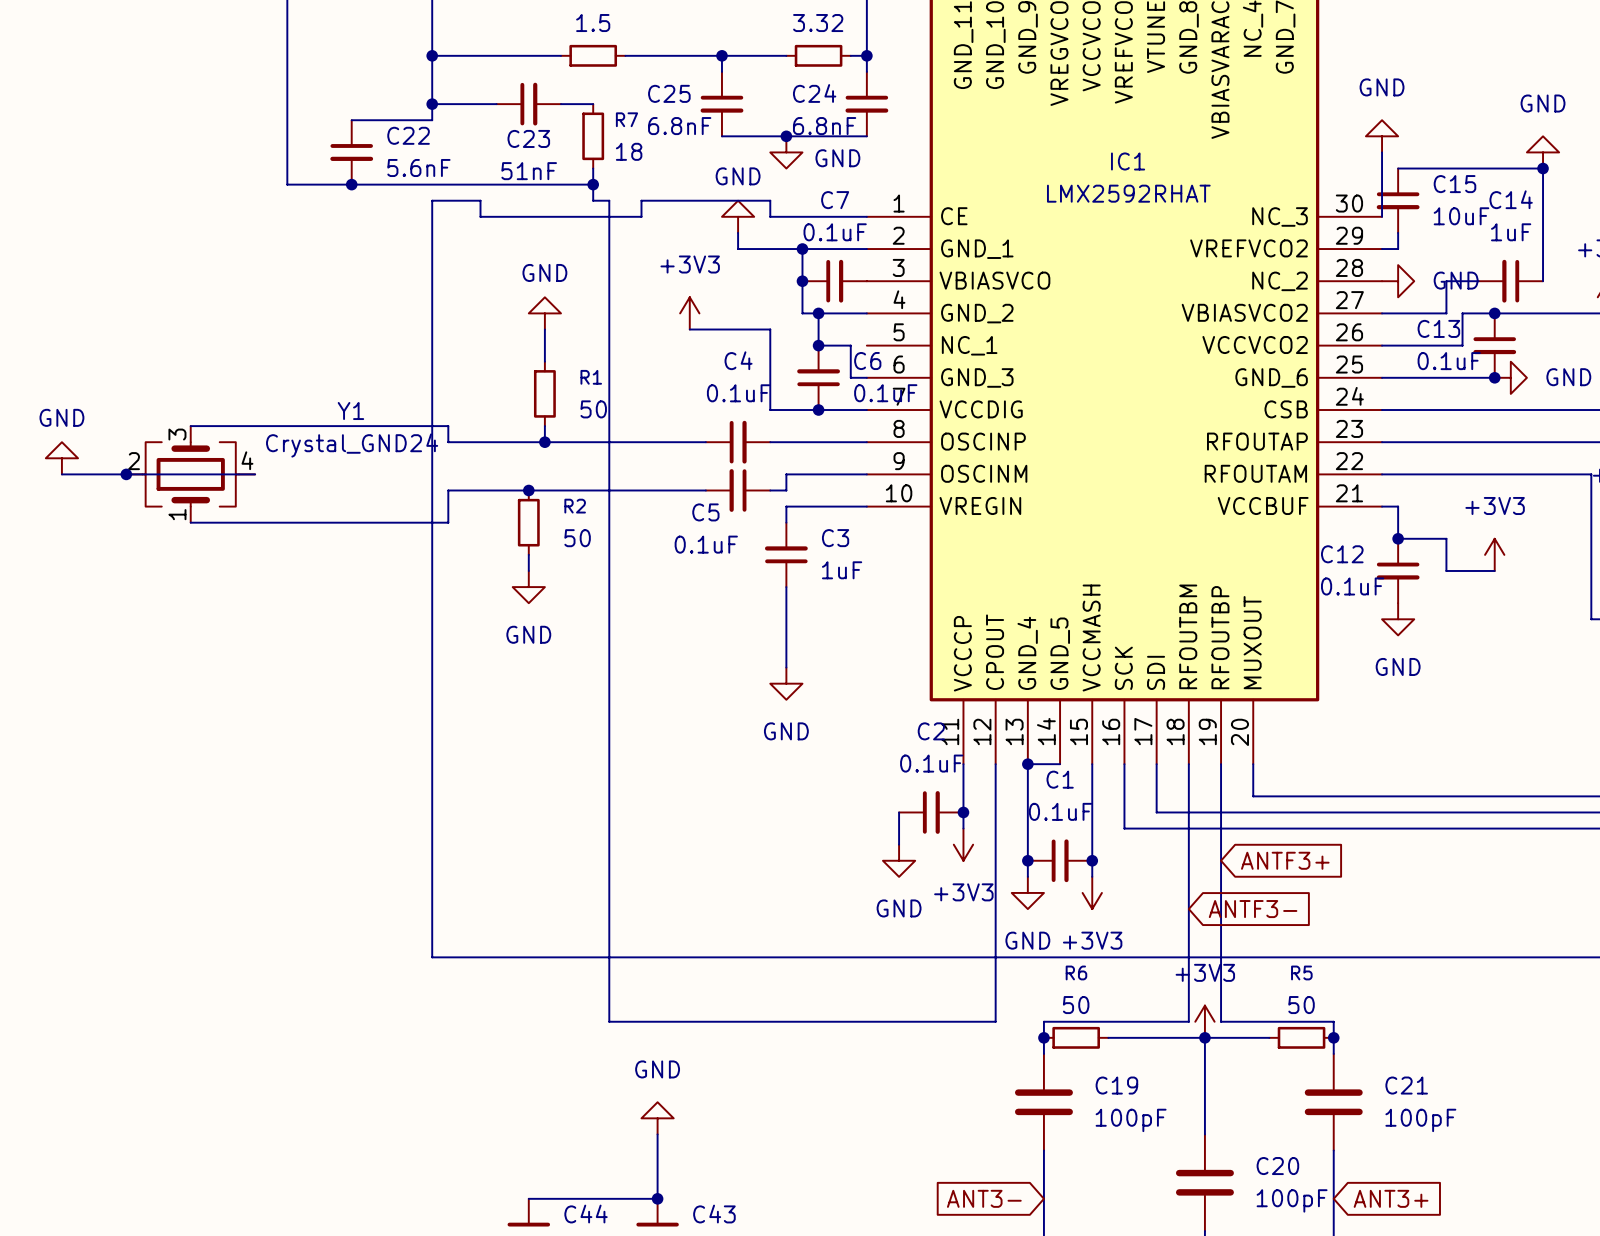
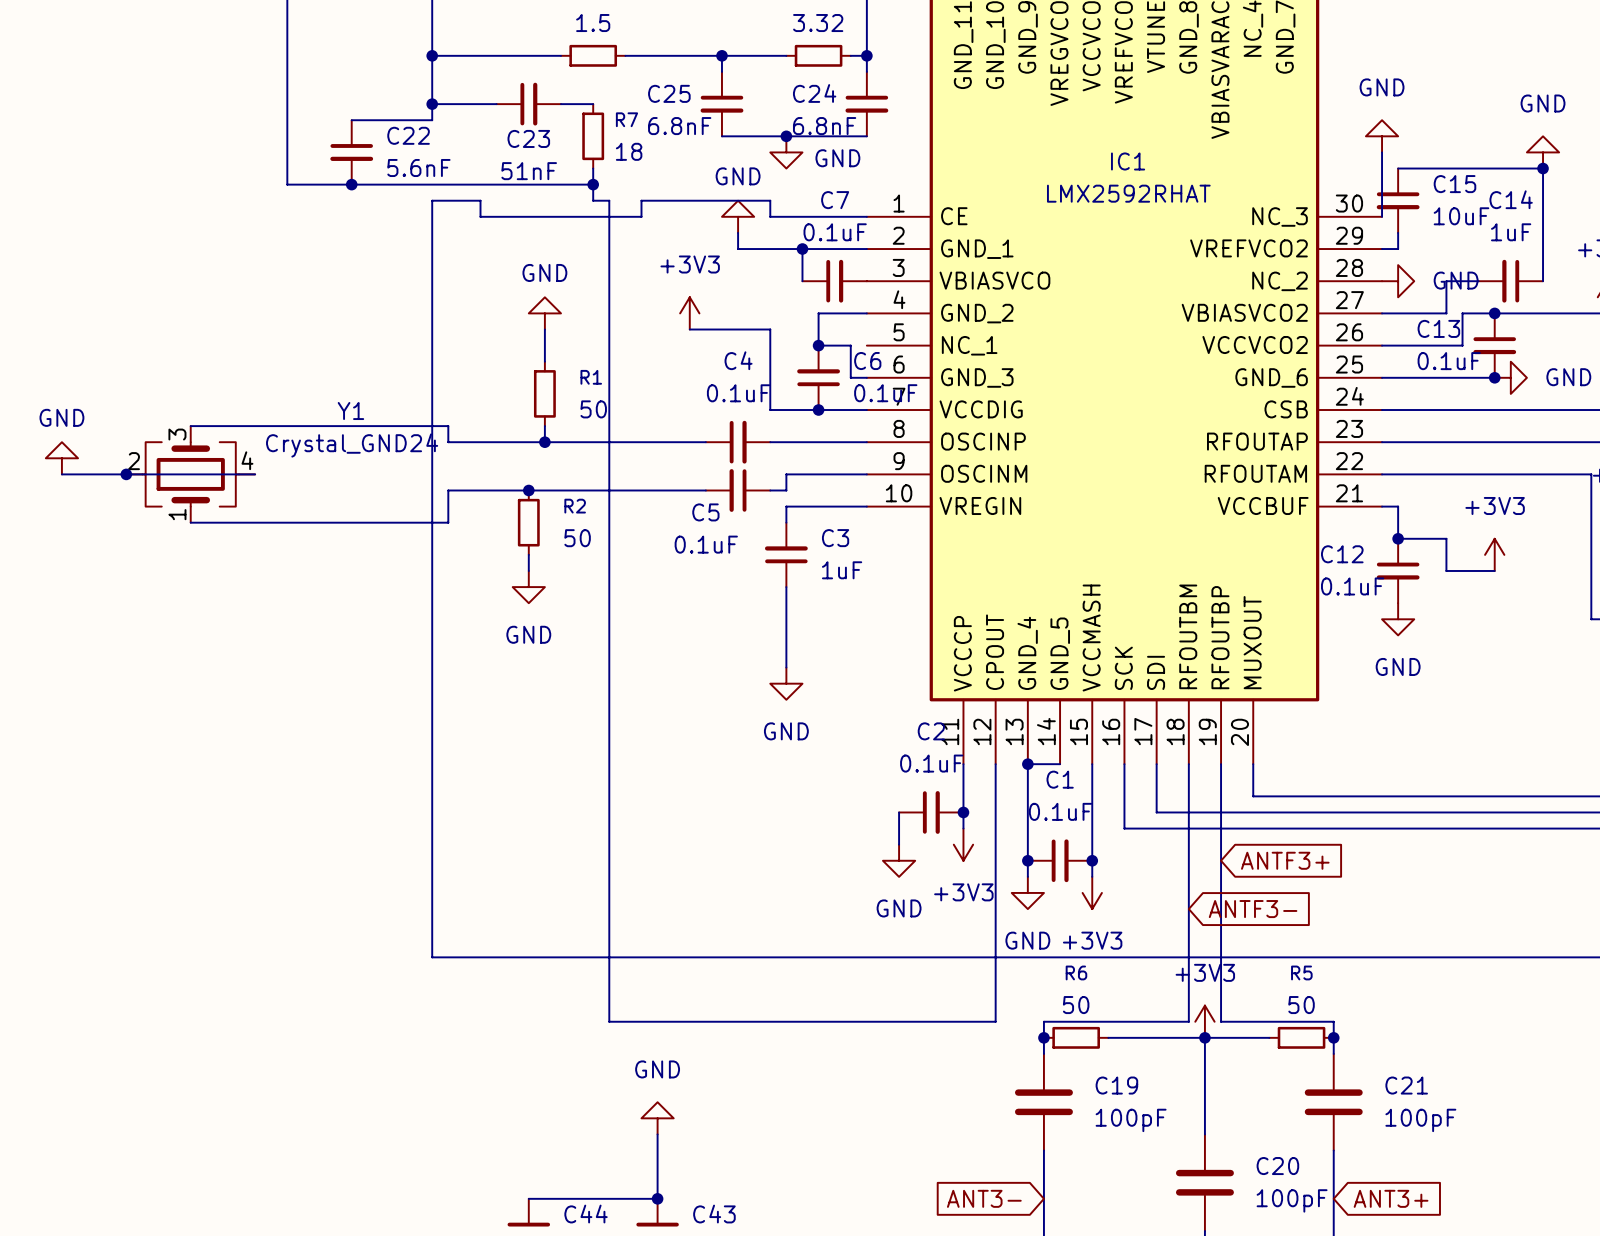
wire: (802, 281) (802, 313) (818, 313) -> none
junction: (802, 281) -> none
junction: (818, 313) -> none

